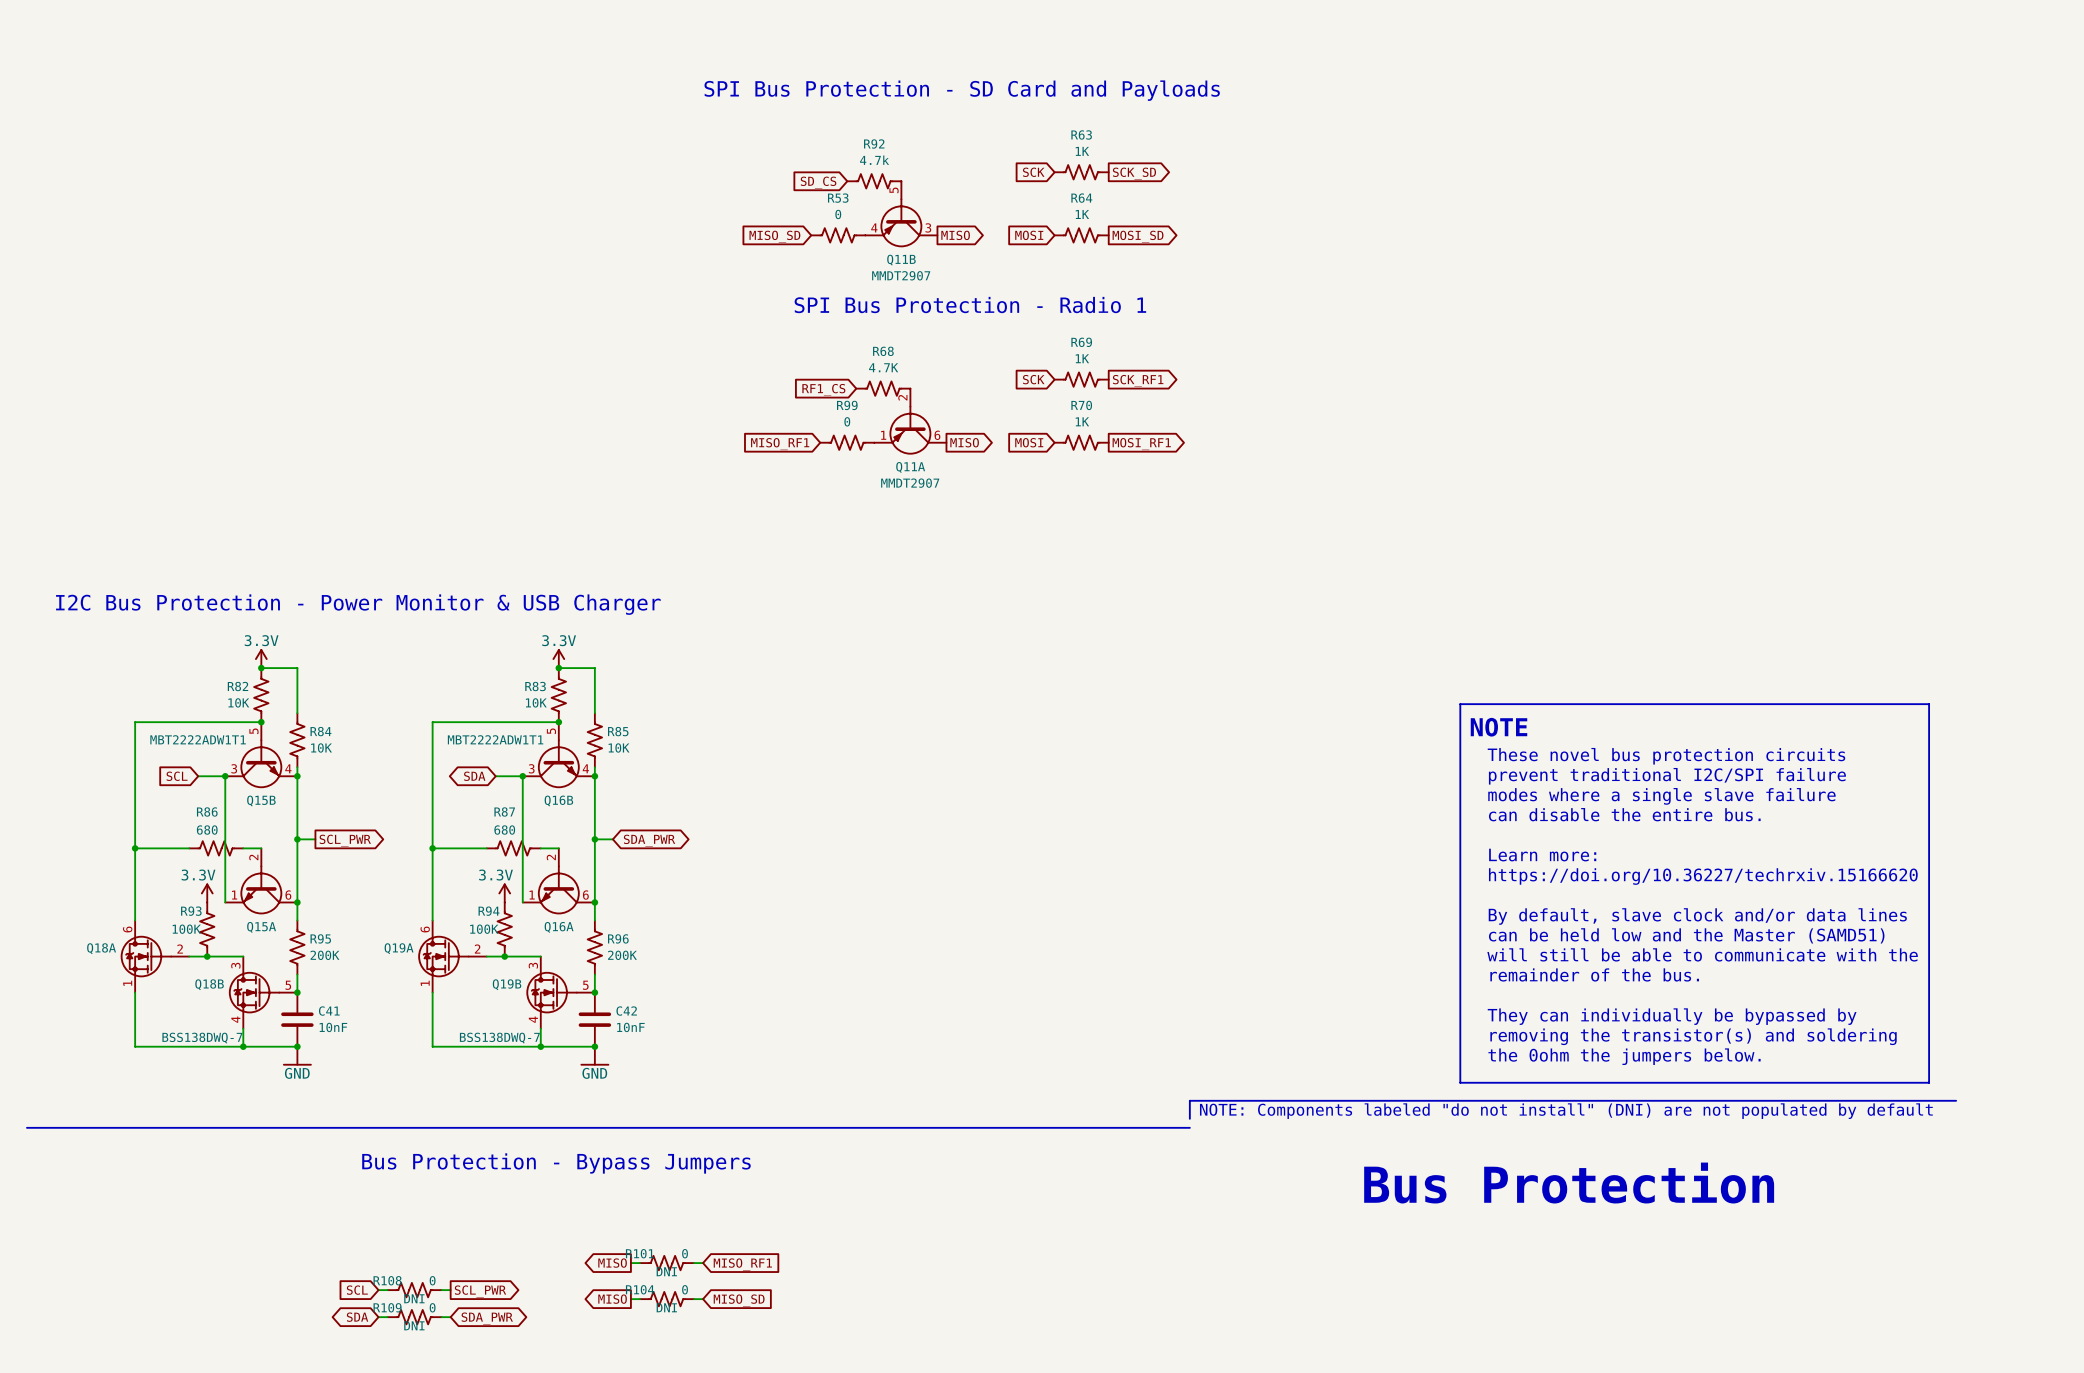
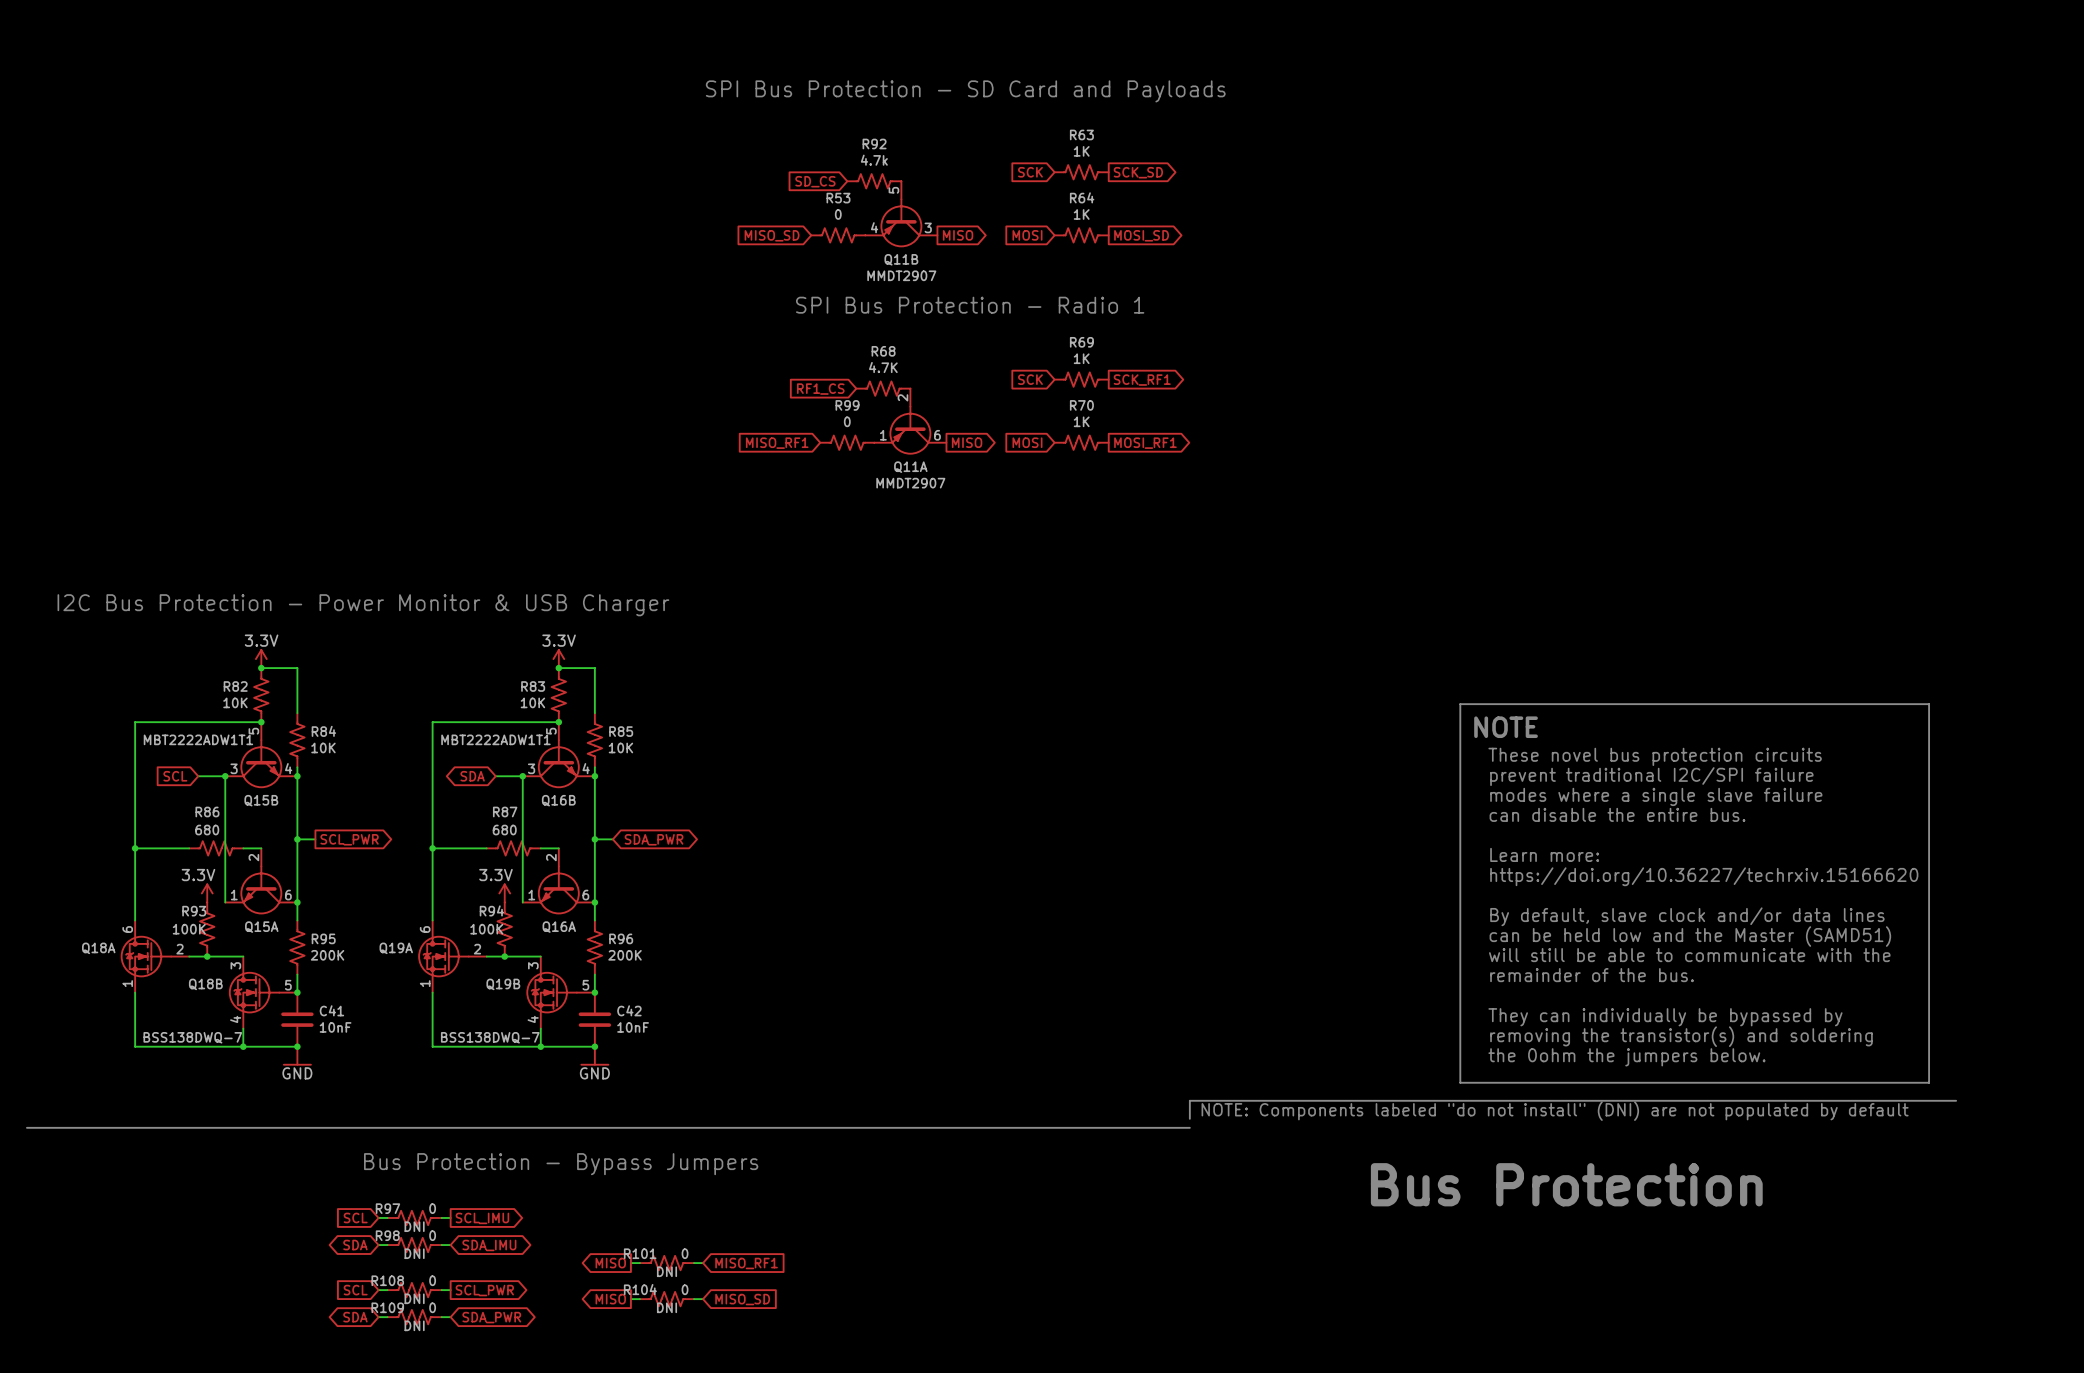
global label: none -> SCL (355, 1217)
wire: none -> (378, 1217) (387, 1217)
R97: none -> 0 (414, 1217)
wire: none -> (441, 1217) (450, 1217)
global label: none -> SCL_IMU (482, 1218)
global label: none -> SDA (355, 1245)
wire: none -> (378, 1245) (387, 1245)
R98: none -> 0 (414, 1245)
wire: none -> (441, 1245) (450, 1245)
global label: none -> SDA_IMU (489, 1245)

